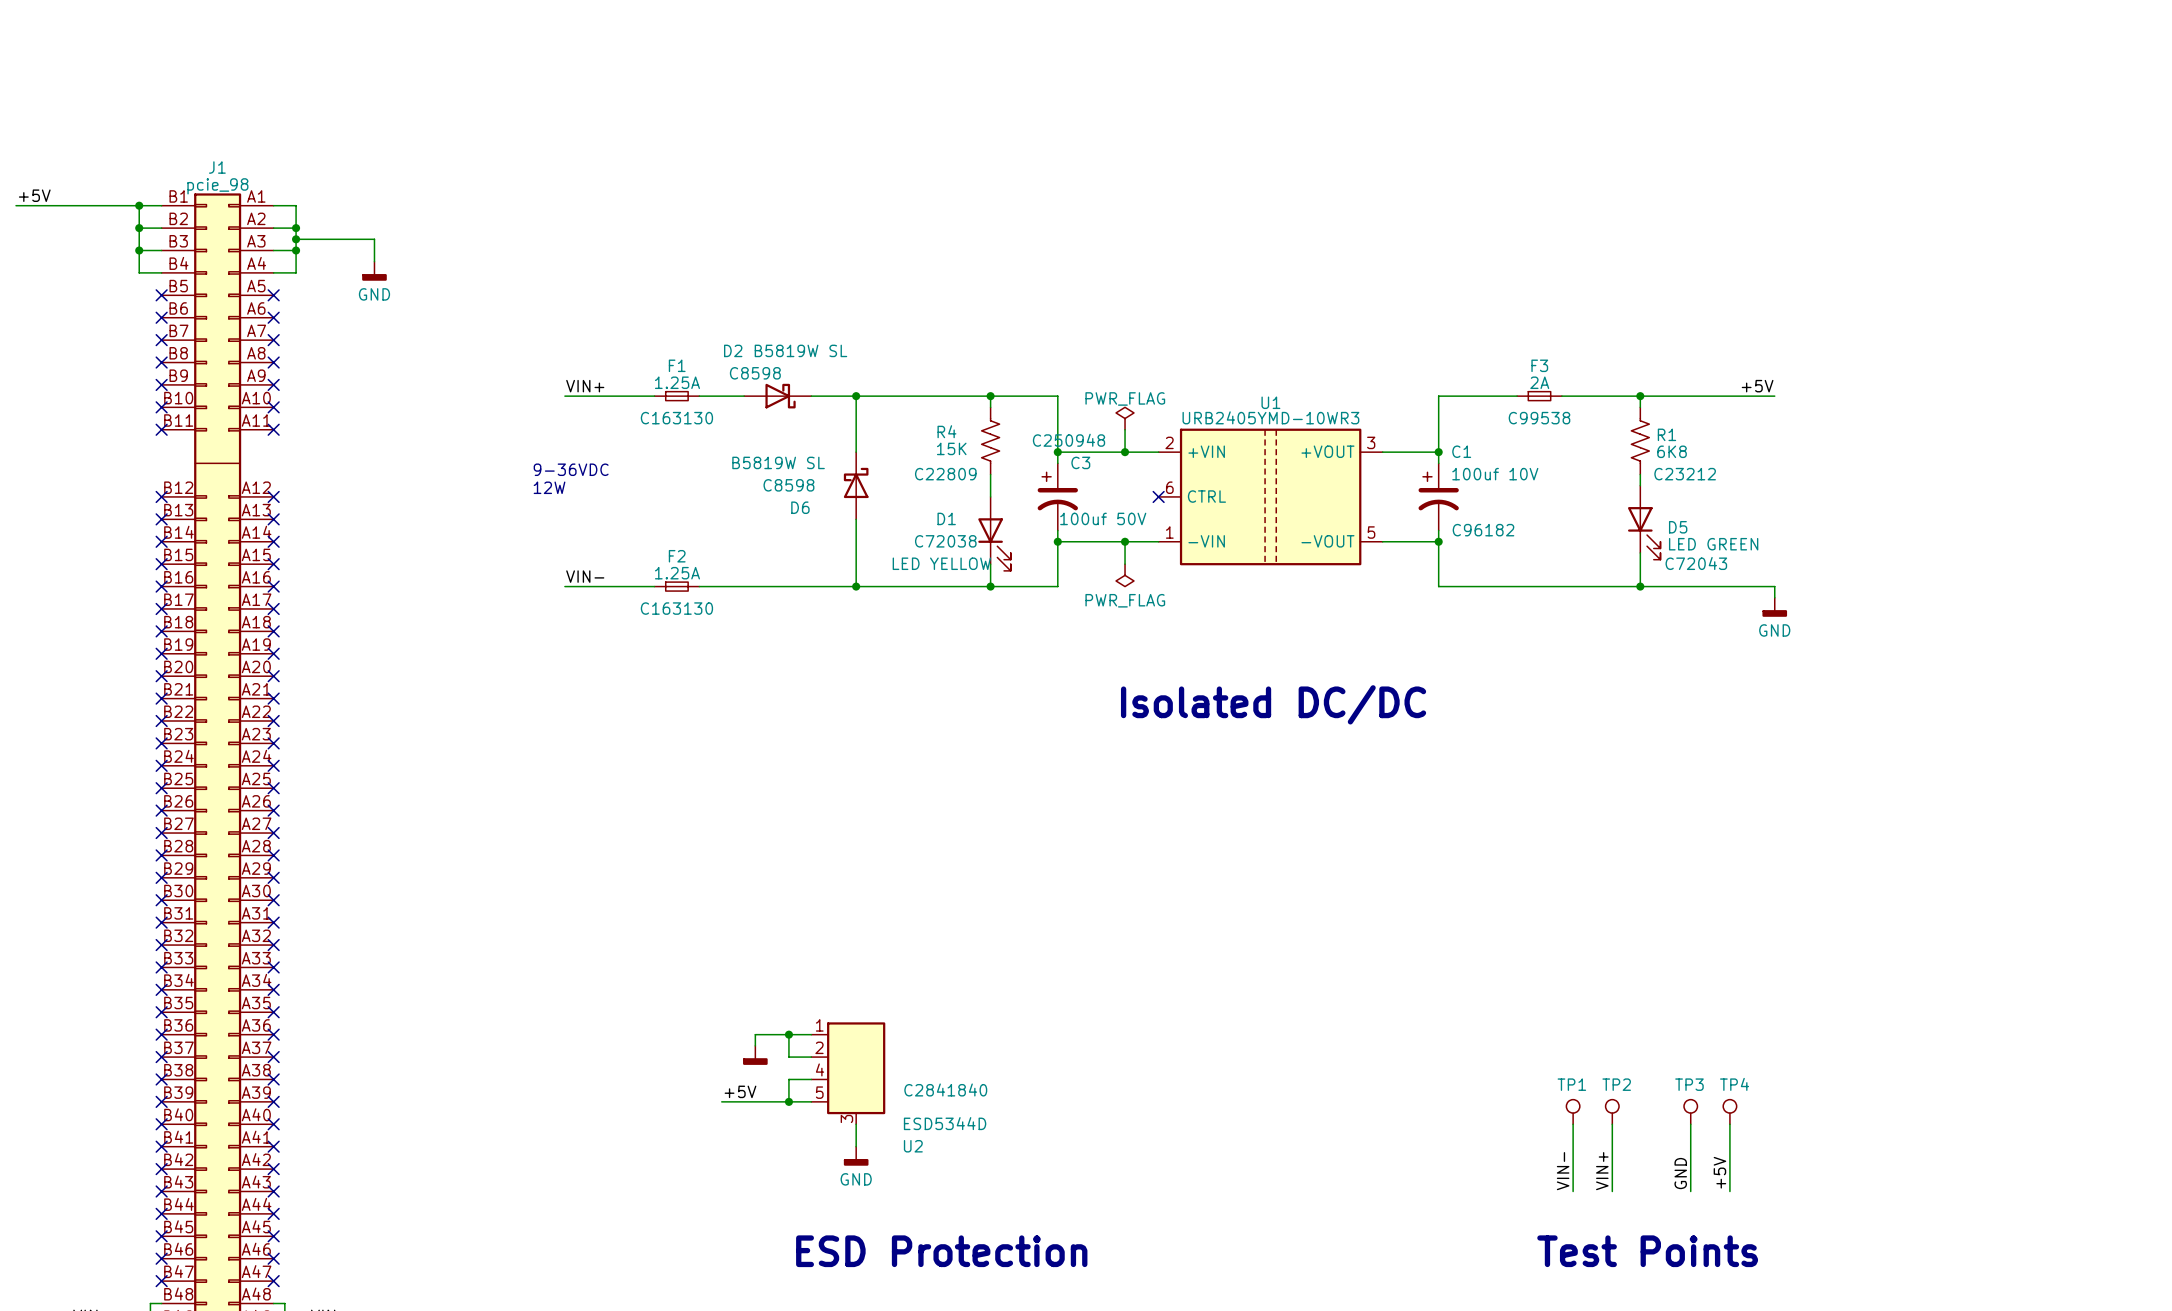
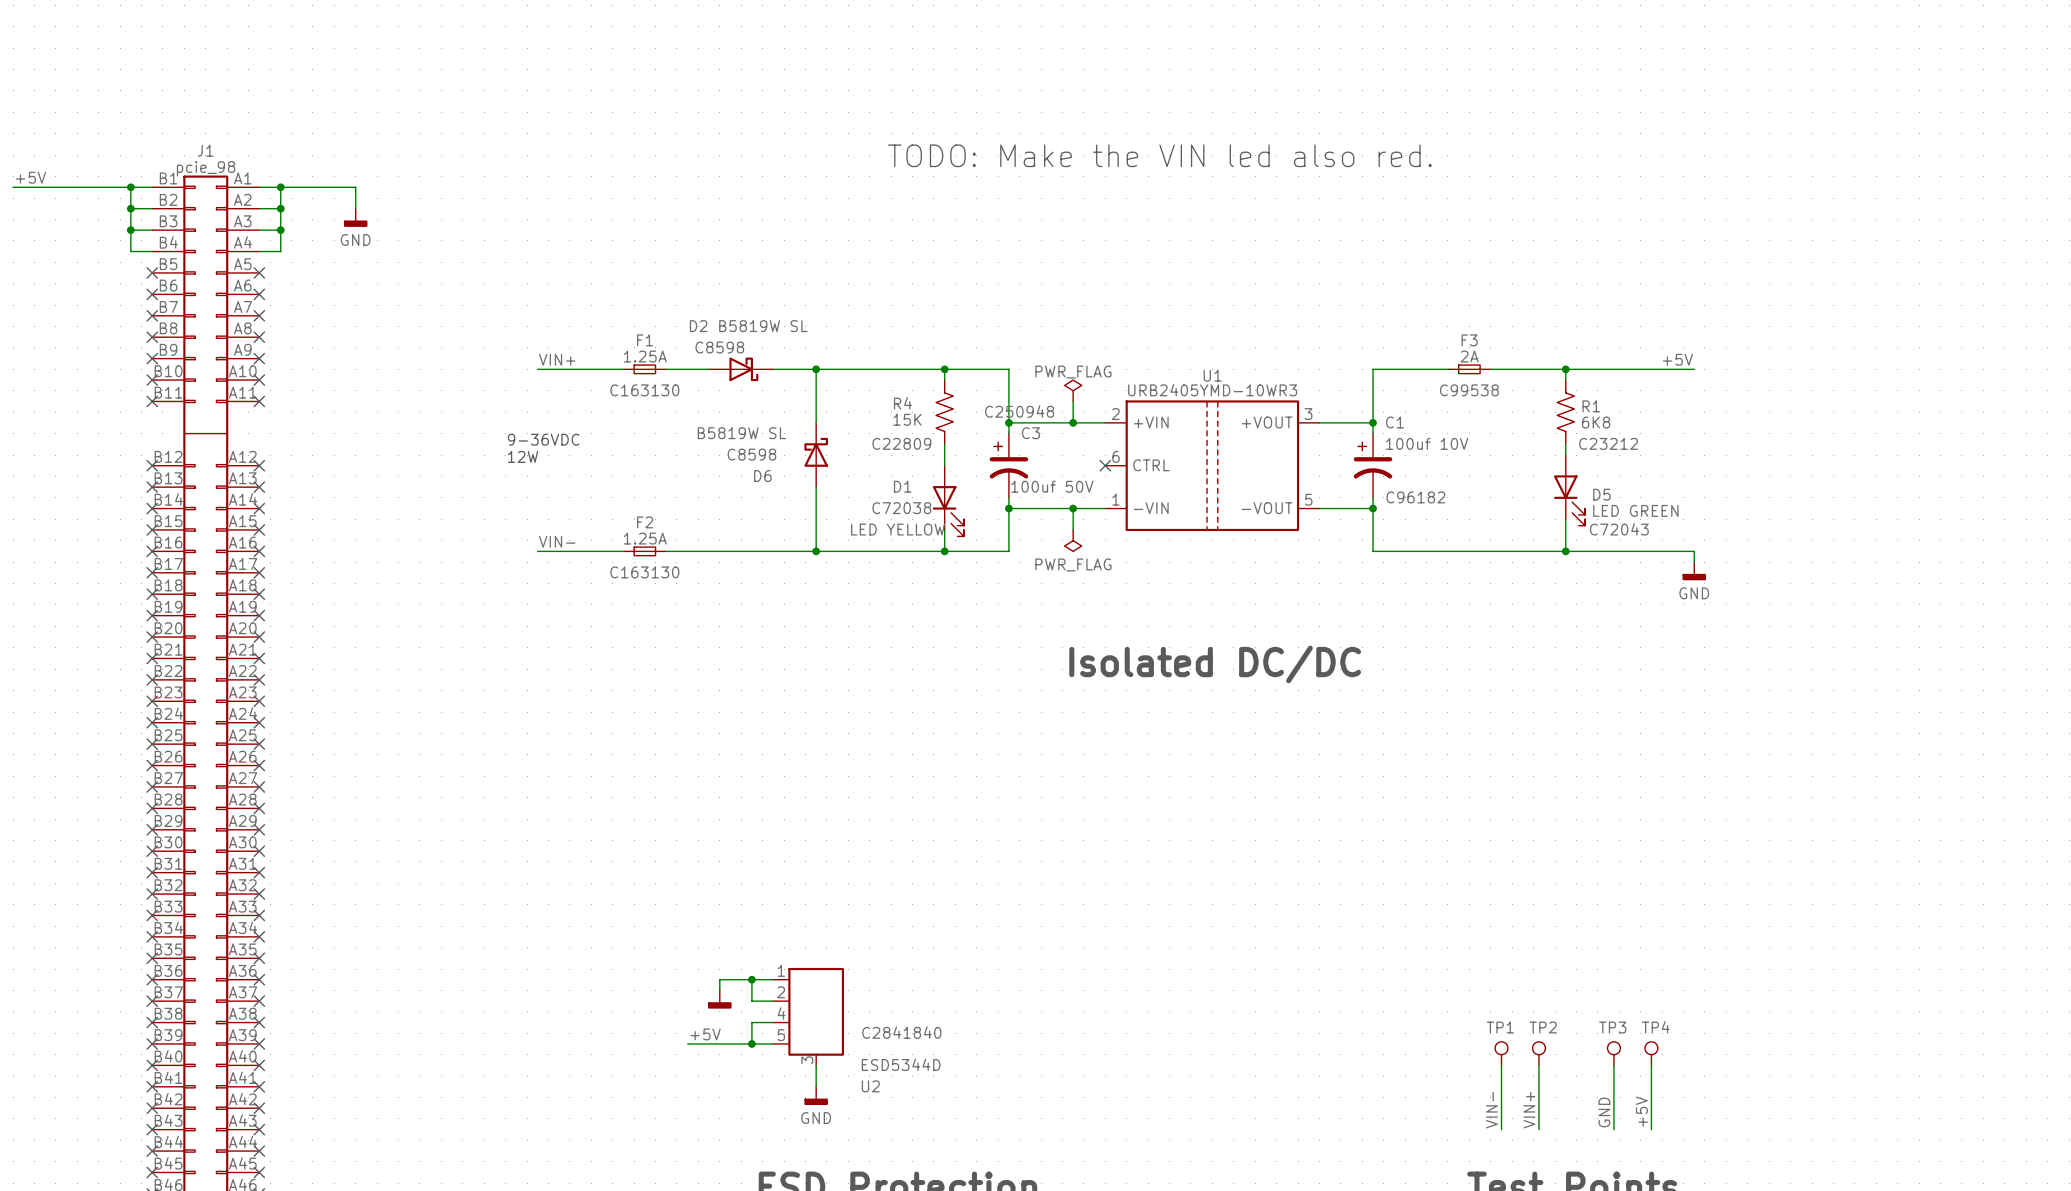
text: none -> TODO: Make the VIN led also red. (1159, 155)
wire: (296, 239) (374, 239) (374, 261) -> (280, 187) (355, 187) (355, 208)
junction position: (296, 239) -> (280, 187)
power symbol position: GND (374, 271) -> GND (355, 217)

